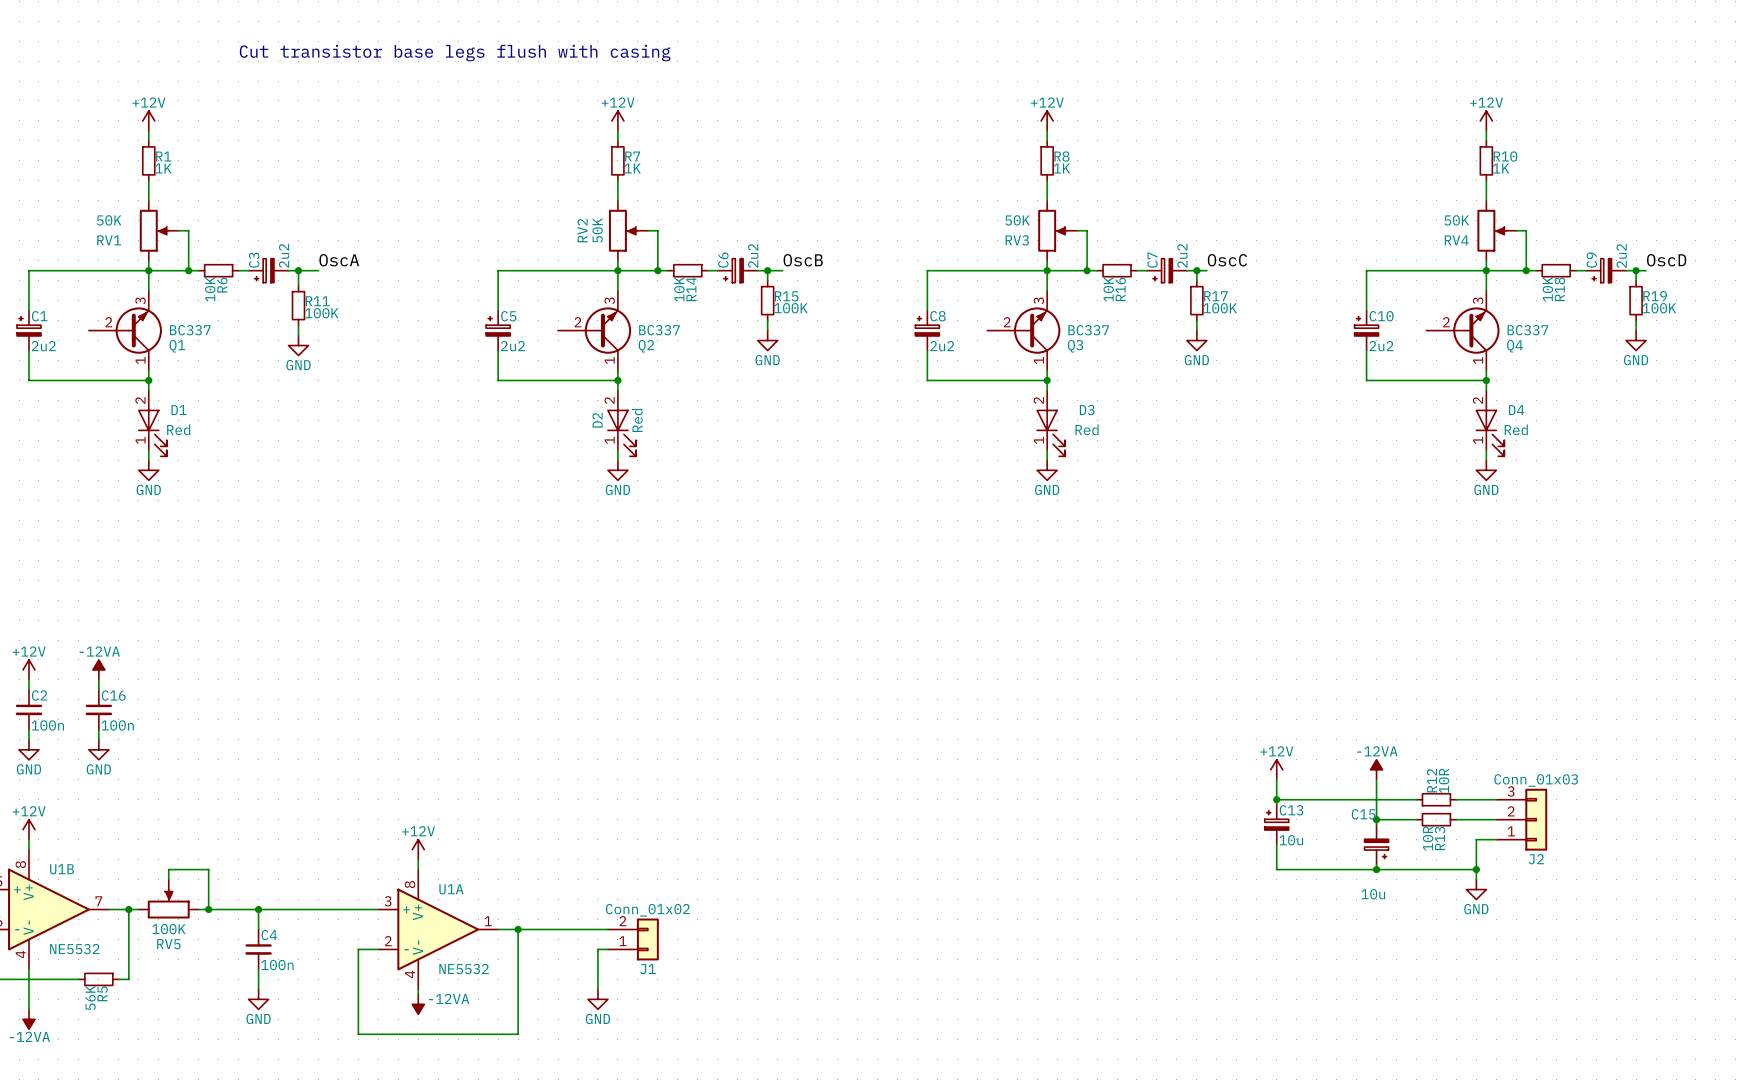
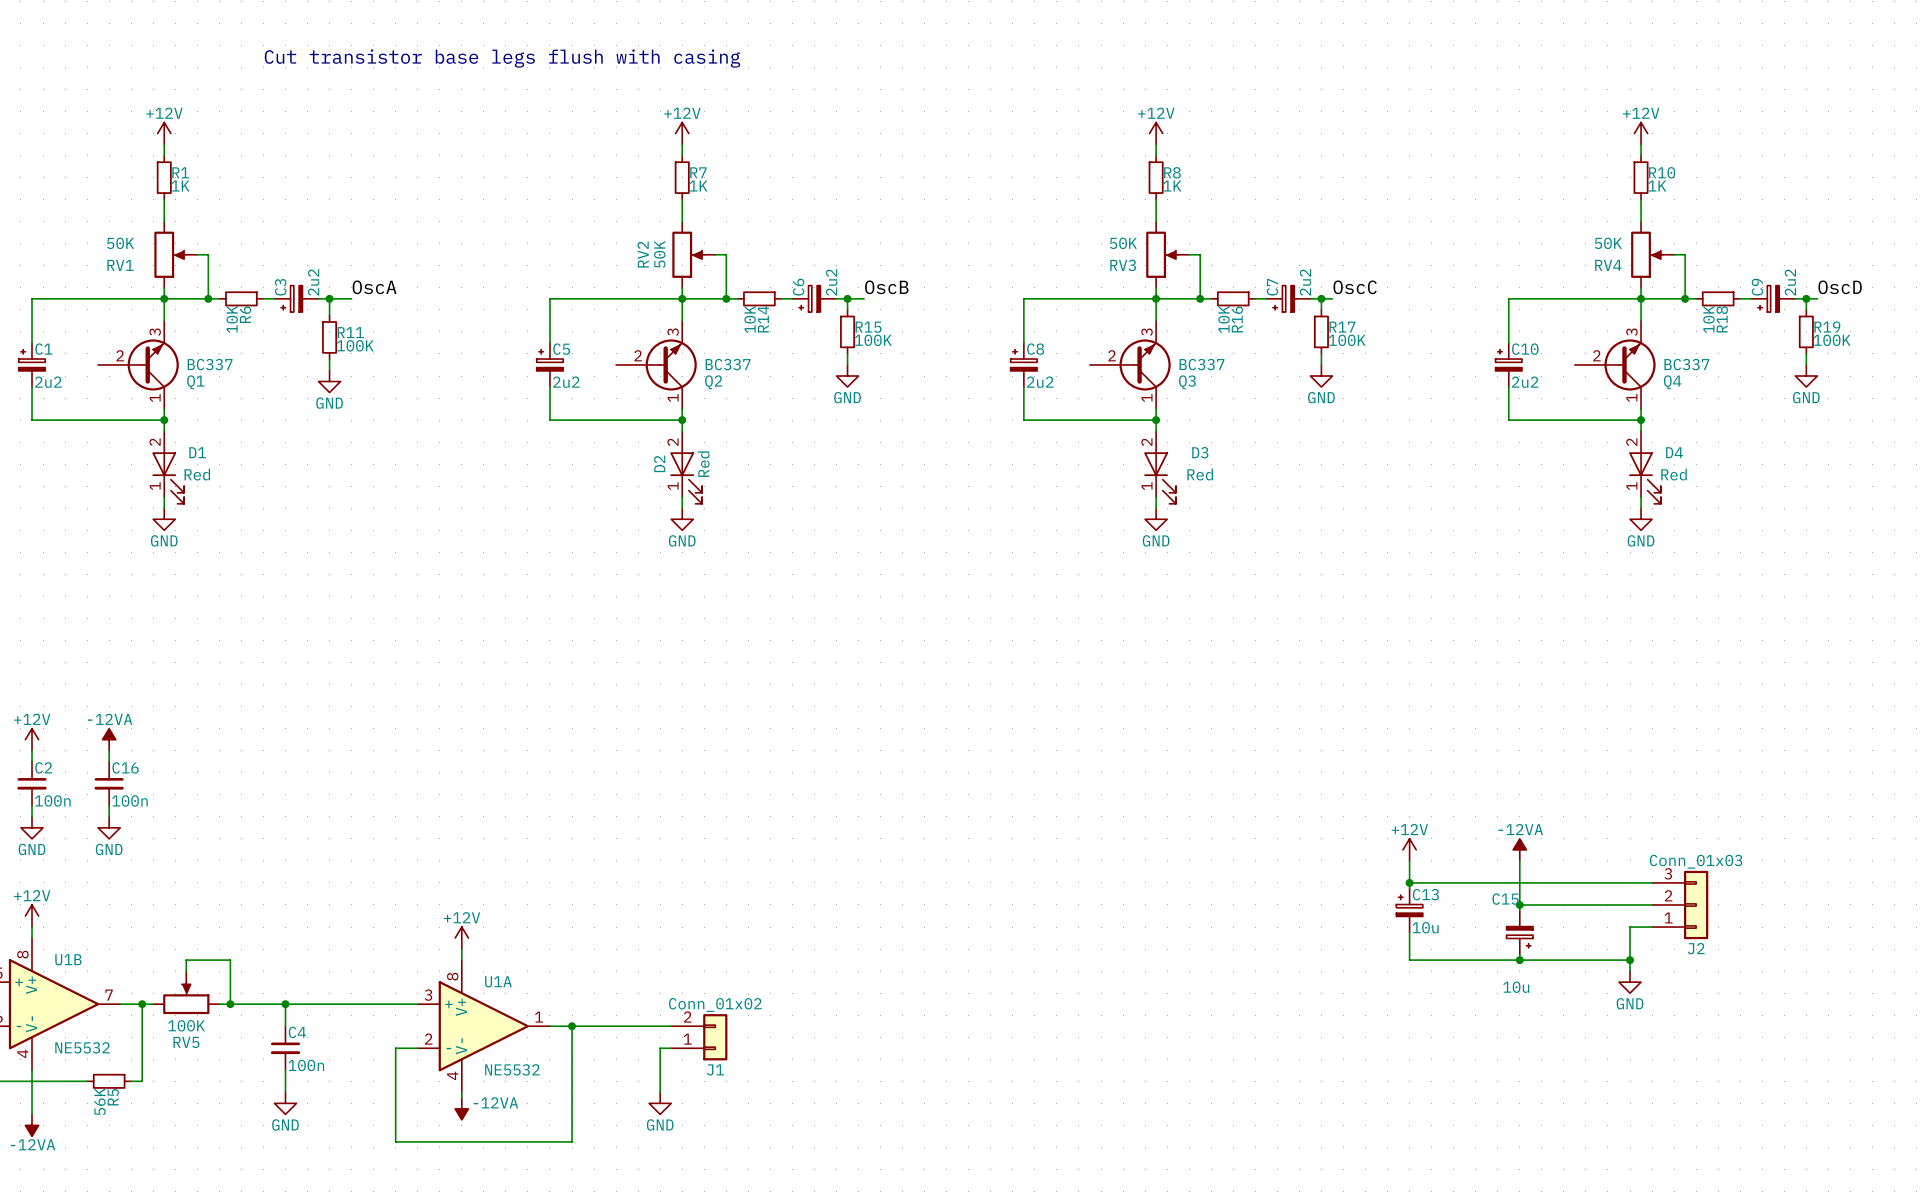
wire: none -> (1563, 882) (1607, 882)
R12: 10R (1436, 799) -> none
wire: none -> (1563, 904) (1607, 904)
R13: 10R (1436, 819) -> none

